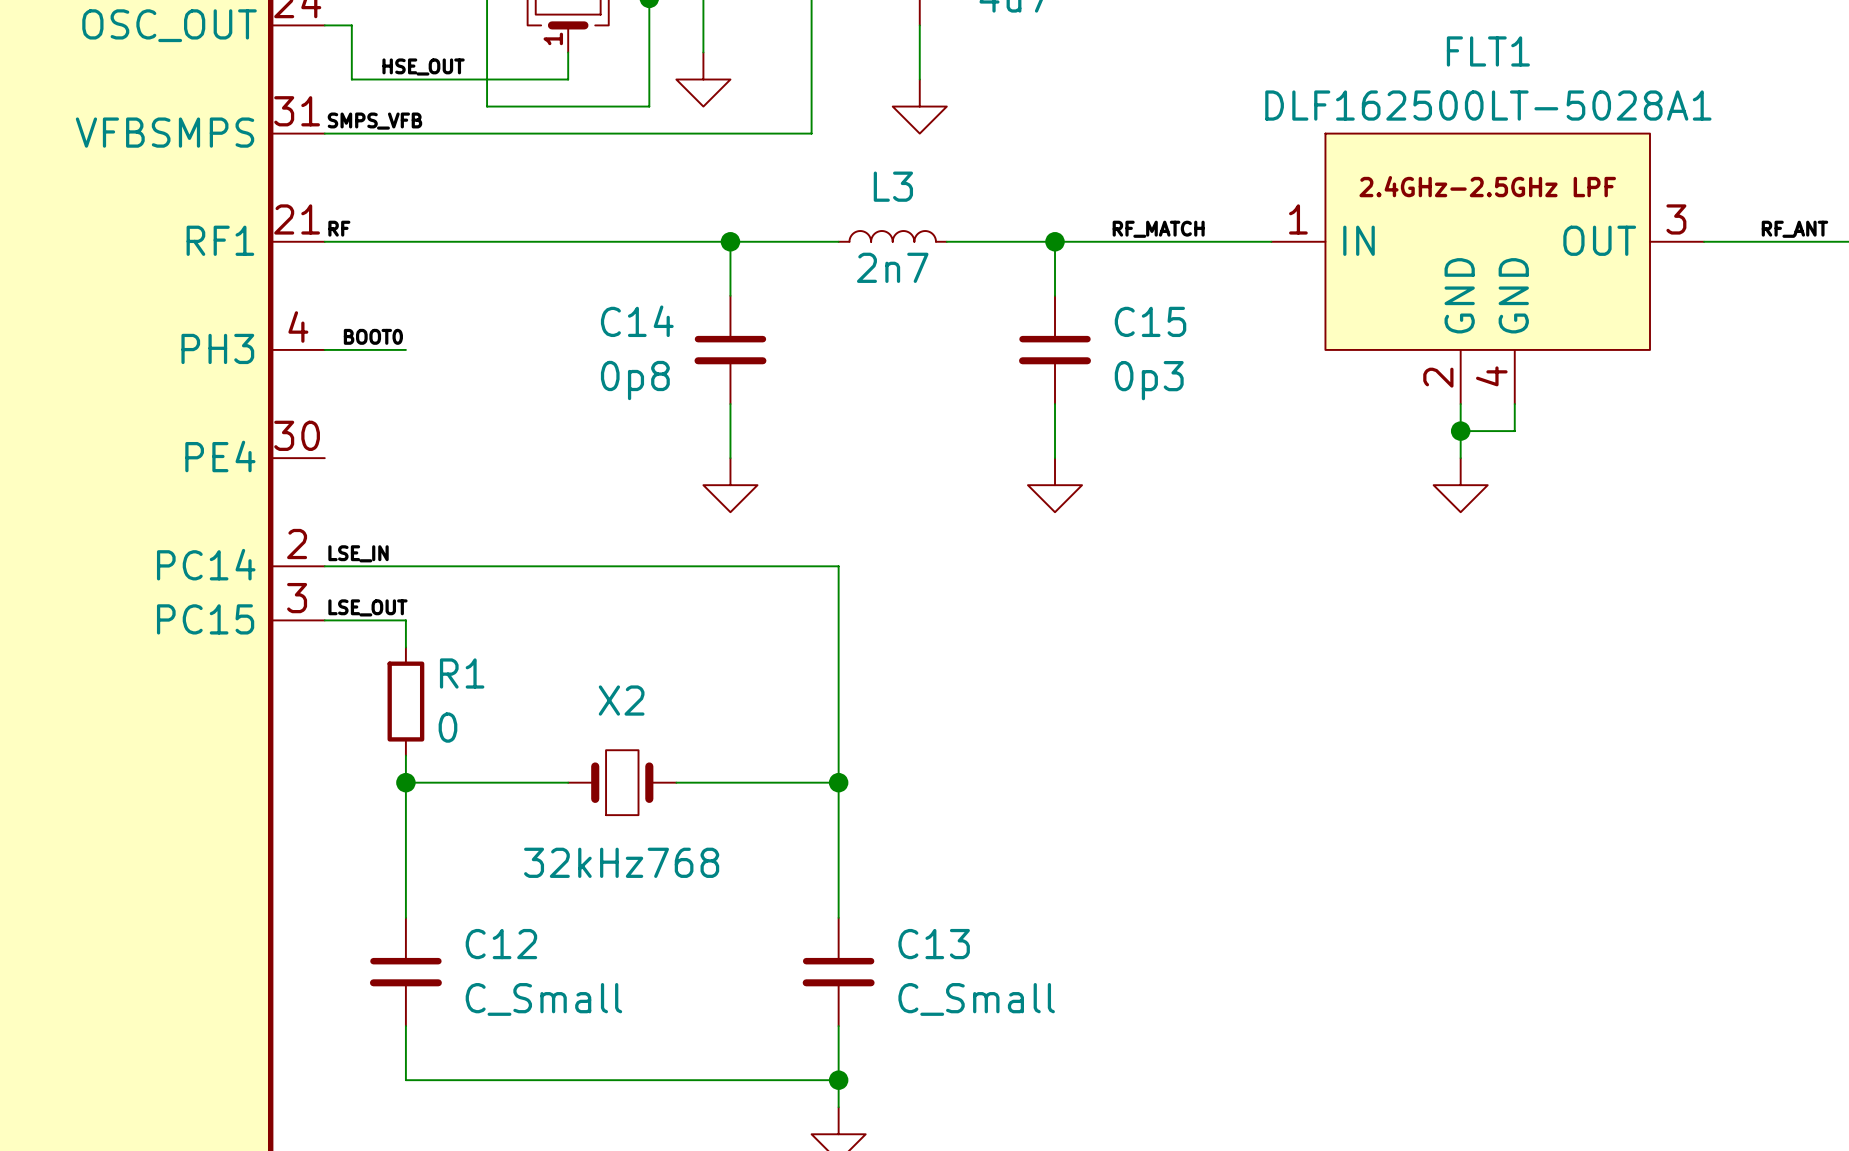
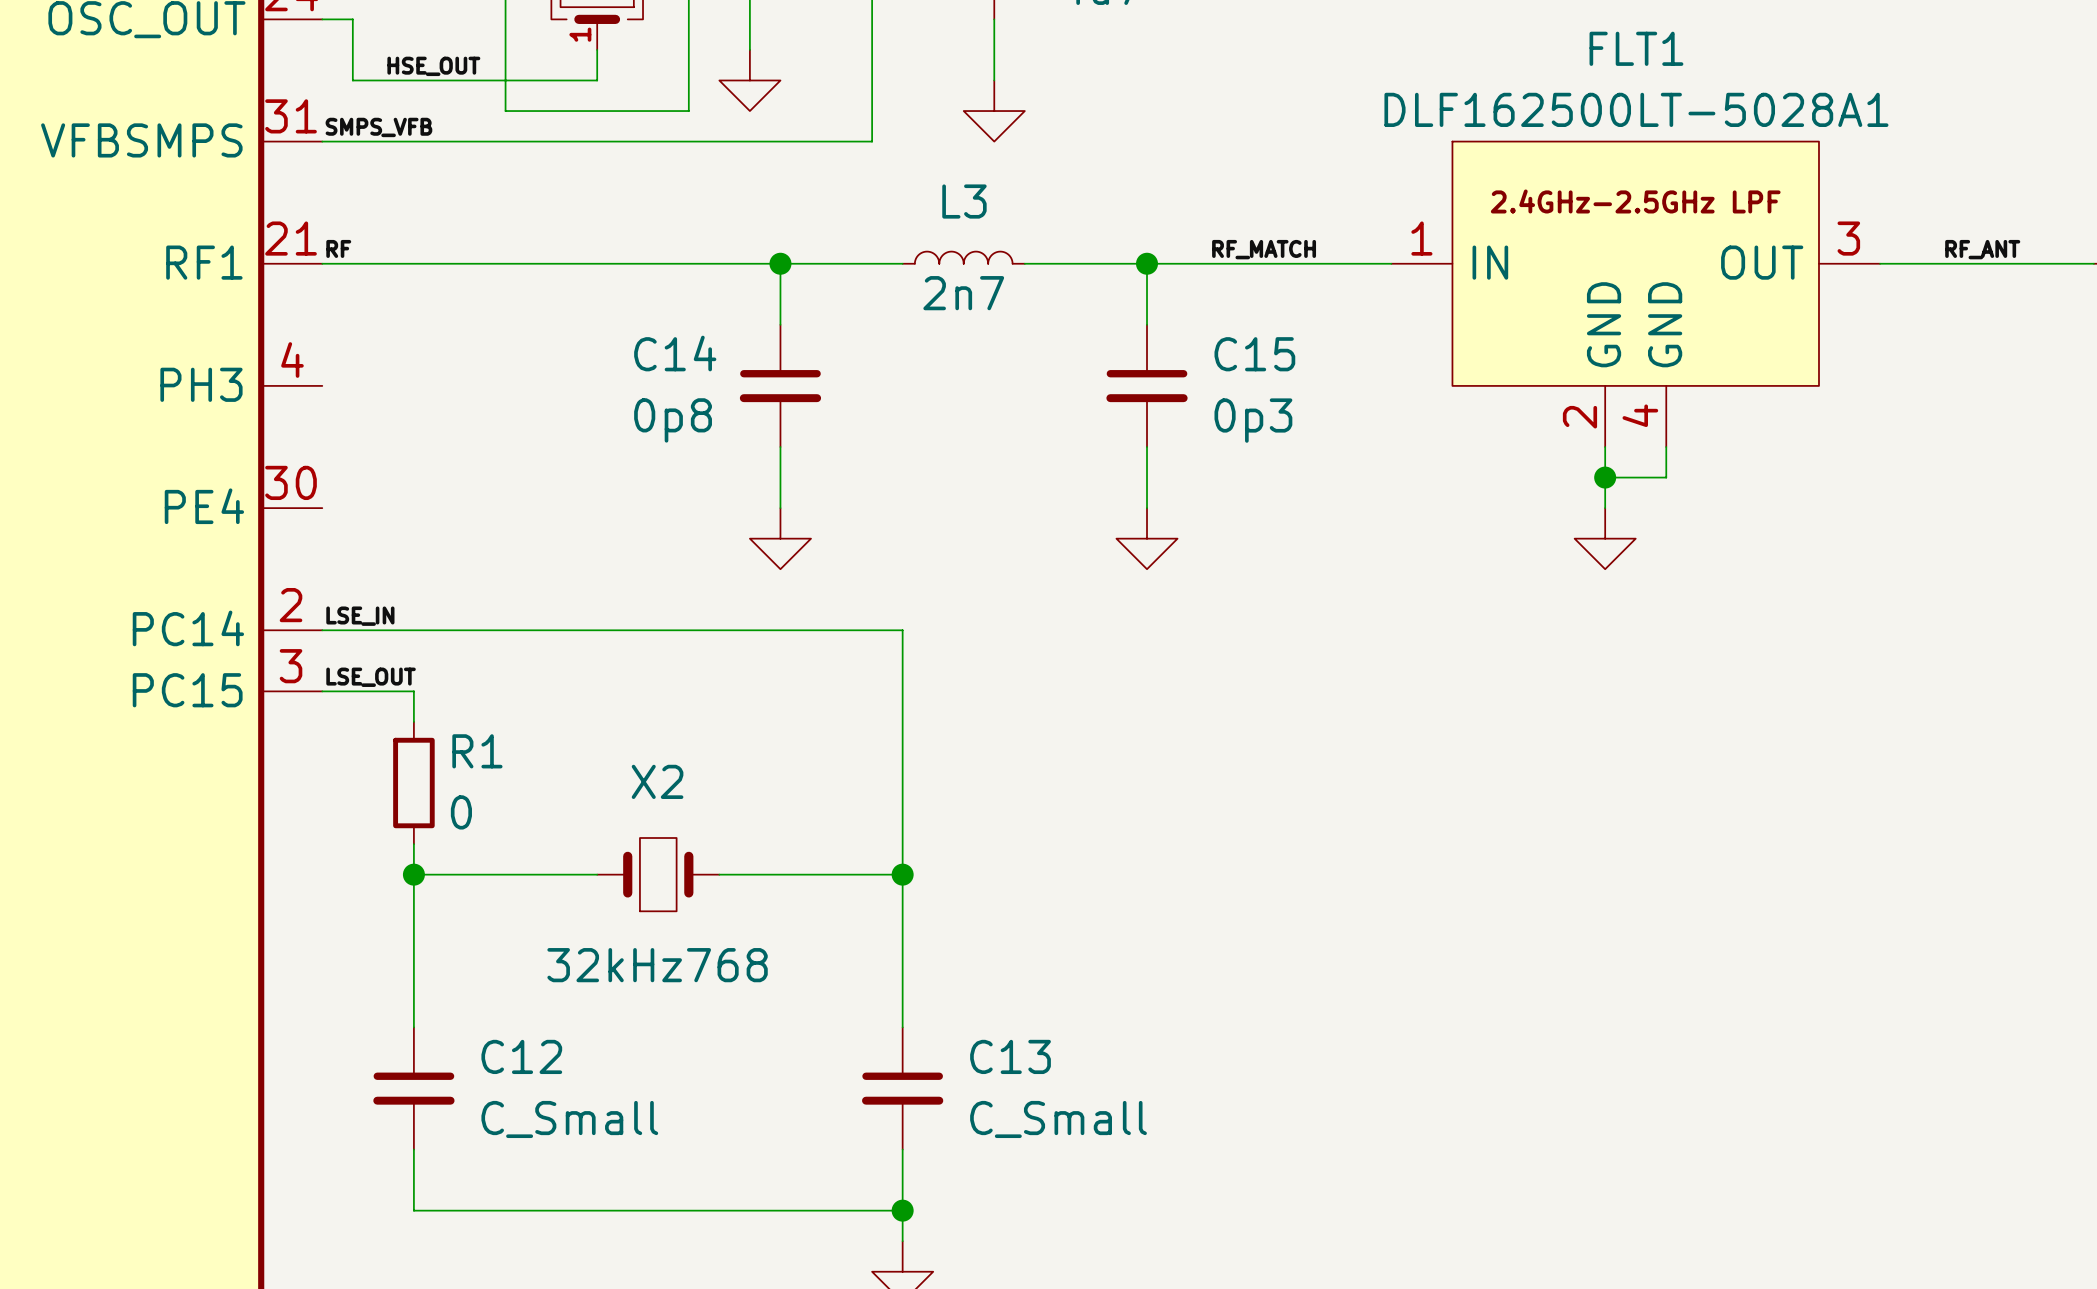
label: BOOT0 (373, 336) -> none
wire: (324, 349) (405, 349) -> none

